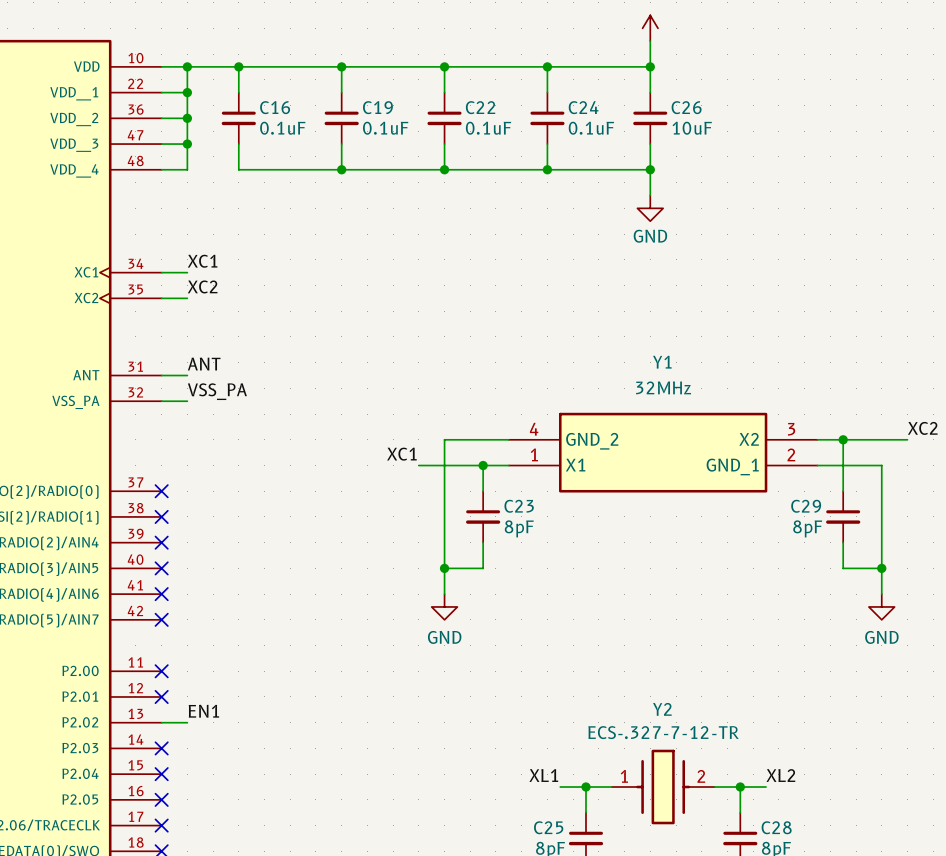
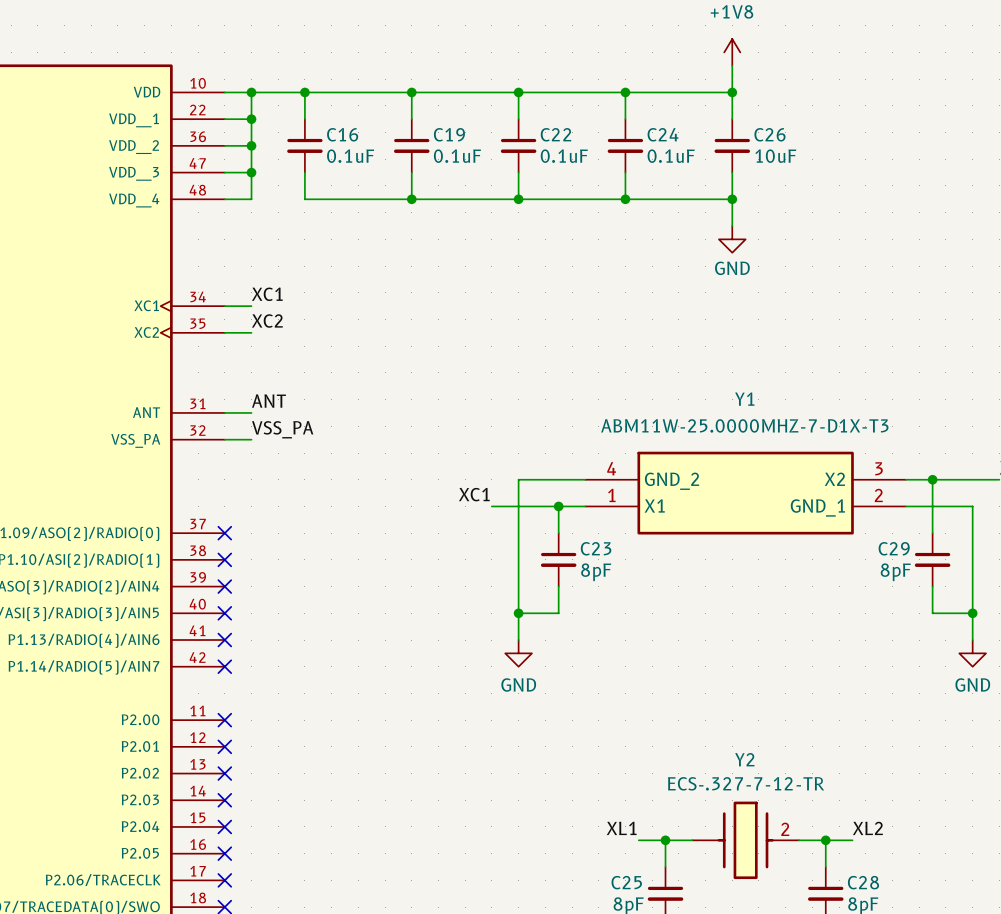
Y1 value: 32MHz (663, 387) -> ABM11W-25.0000MHZ-7-D1X-T3 (744, 425)
label: EN1 (203, 711) -> none
wire: (161, 722) (187, 722) -> none
no-connect mark: none -> (224, 773)
Y2 pin number: 1 (624, 776) -> none

